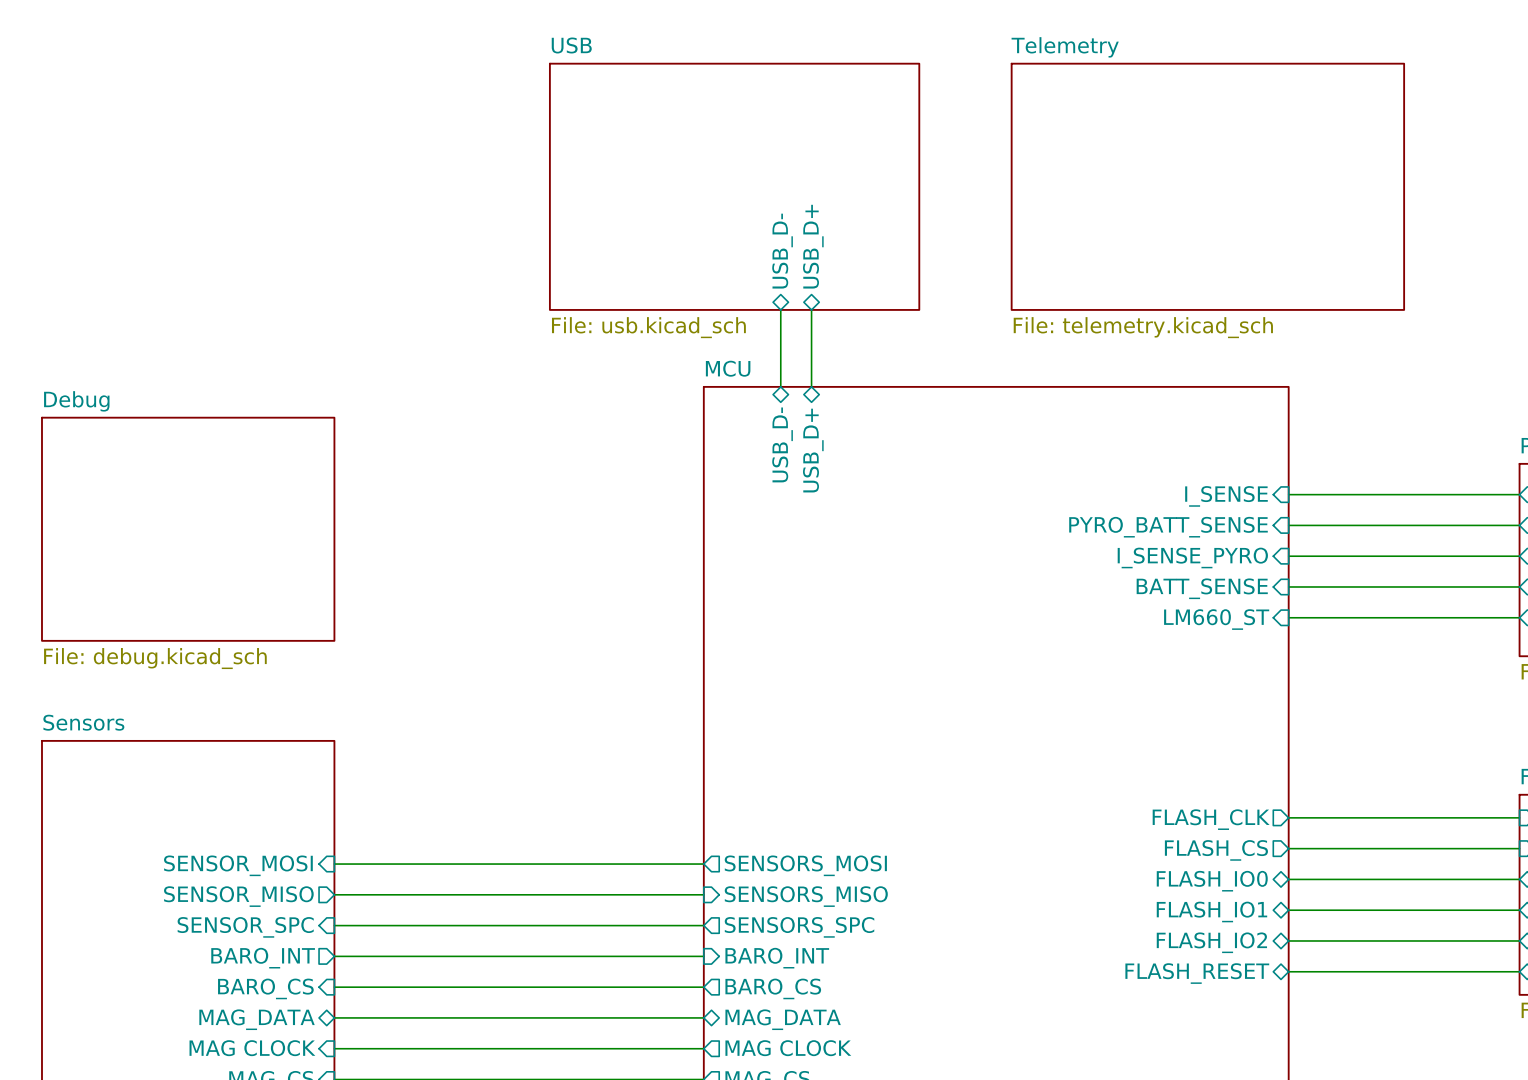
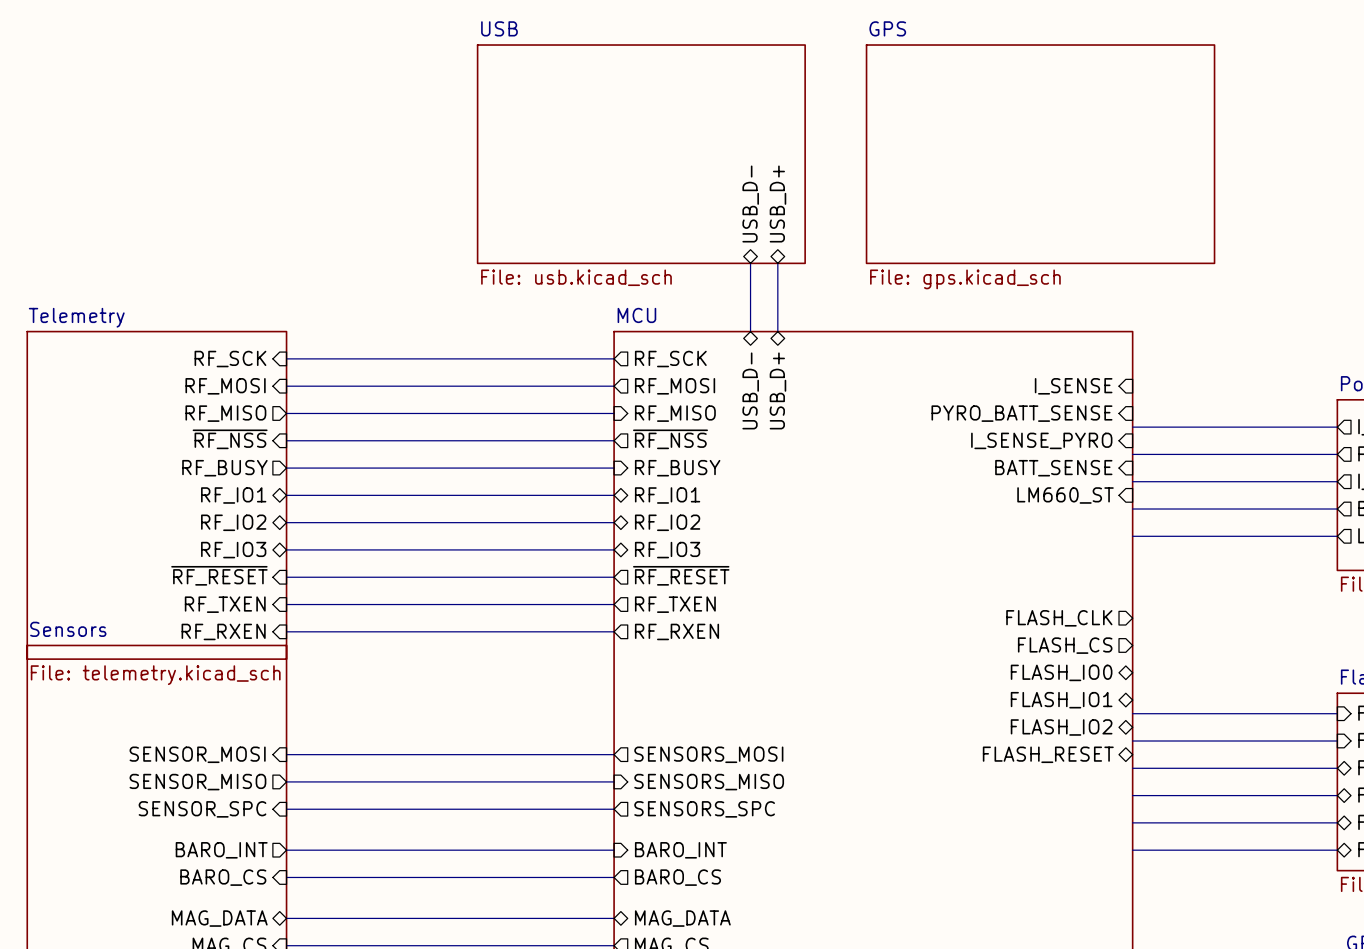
sheet GPS: none -> File: gps.kicad_sch (1040, 154)
sheet Telemetry: File: telemetry.kicad_sch (1207, 186) -> none
sheet pin: USB_D+ (813, 246) -> none
sheet pin: none -> USB_D+ (777, 204)
sheet pin: USB_D- (782, 251) -> none
sheet pin: none -> USB_D- (750, 204)
wire: (780, 309) (780, 386) -> (750, 263) (750, 331)
wire: (811, 309) (811, 386) -> (777, 263) (777, 331)
wire: none -> (286, 358) (614, 358)
sheet pin: none -> RF_SCK (230, 359)
sheet pin: none -> RF_SCK (670, 359)
sheet pin: USB_D- (782, 444) -> none
sheet pin: none -> USB_D- (750, 390)
wire: none -> (286, 386) (614, 386)
sheet pin: none -> RF_MOSI (225, 386)
sheet pin: none -> RF_MOSI (675, 386)
sheet pin: USB_D+ (813, 450) -> none
sheet pin: none -> USB_D+ (777, 390)
wire: none -> (286, 413) (614, 413)
sheet pin: none -> RF_MISO (225, 413)
sheet pin: none -> RF_MISO (675, 413)
sheet pin position: I_SENSE (1226, 496) -> I_SENSE (1073, 386)
sheet pin: none -> ~{RF_NSS} (230, 439)
wire: none -> (286, 440) (614, 440)
sheet pin: none -> ~{RF_NSS} (670, 439)
sheet pin position: PYRO_BATT_SENSE (1168, 527) -> PYRO_BATT_SENSE (1021, 413)
sheet Debug: File: debug.kicad_sch (188, 529) -> none
wire: none -> (286, 468) (614, 468)
sheet pin: none -> RF_BUSY (224, 468)
sheet pin: none -> RF_BUSY (677, 468)
sheet pin position: I_SENSE_PYRO (1192, 557) -> I_SENSE_PYRO (1041, 440)
sheet Telemetry: none -> File: telemetry.kicad_sch (156, 495)
wire: none -> (286, 495) (614, 495)
sheet pin: none -> RF_IO1 (233, 495)
sheet pin: none -> RF_IO1 (667, 495)
sheet pin position: BATT_SENSE (1202, 588) -> BATT_SENSE (1053, 468)
wire: none -> (286, 522) (614, 522)
sheet pin: none -> RF_IO2 (233, 522)
sheet pin: none -> RF_IO2 (667, 522)
sheet pin position: LM660_ST (1216, 619) -> LM660_ST (1065, 495)
wire: none -> (286, 549) (614, 549)
sheet pin: none -> RF_IO3 (233, 550)
sheet pin: none -> RF_IO3 (667, 550)
sheet pin: none -> ~{RF_RESET} (219, 575)
sheet pin: none -> ~{RF_RESET} (681, 575)
sheet pin: none -> RF_TXEN (225, 604)
sheet pin: none -> RF_TXEN (675, 604)
sheet pin: none -> RF_RXEN (223, 631)
sheet pin: none -> RF_RXEN (676, 631)
sheet pin position: FLASH_CLK (1211, 819) -> FLASH_CLK (1059, 618)
sheet pin position: FLASH_CS (1216, 850) -> FLASH_CS (1065, 645)
sheet pin position: FLASH_IO0 (1212, 881) -> FLASH_IO0 (1061, 672)
sheet pin position: FLASH_IO1 (1211, 911) -> FLASH_IO1 (1061, 700)
sheet pin position: FLASH_IO2 (1211, 942) -> FLASH_IO2 (1061, 727)
wire: (334, 956) (703, 956) -> (286, 577) (614, 577)
sheet pin position: BARO_INT (263, 958) -> BARO_INT (221, 850)
sheet pin position: BARO_INT (777, 958) -> BARO_INT (680, 850)
wire: none -> (286, 850) (614, 850)
sheet pin position: FLASH_RESET (1197, 973) -> FLASH_RESET (1048, 754)
wire: (334, 987) (703, 987) -> (286, 604) (614, 604)
sheet pin position: BARO_CS (265, 988) -> BARO_CS (223, 877)
sheet pin position: BARO_CS (773, 988) -> BARO_CS (677, 877)
wire: none -> (286, 877) (614, 877)
wire: (334, 1017) (703, 1017) -> (286, 631) (614, 631)
sheet pin: MAG_DATA (257, 1019) -> none
sheet pin: MAG_DATA (783, 1019) -> none
sheet pin shape: input (252, 1048) -> bidirectional (219, 918)
sheet pin: MAG CLOCK (252, 1048) -> MAG_DATA (219, 918)
sheet pin shape: output (788, 1048) -> bidirectional (682, 918)
sheet pin: MAG CLOCK (788, 1048) -> MAG_DATA (682, 918)

